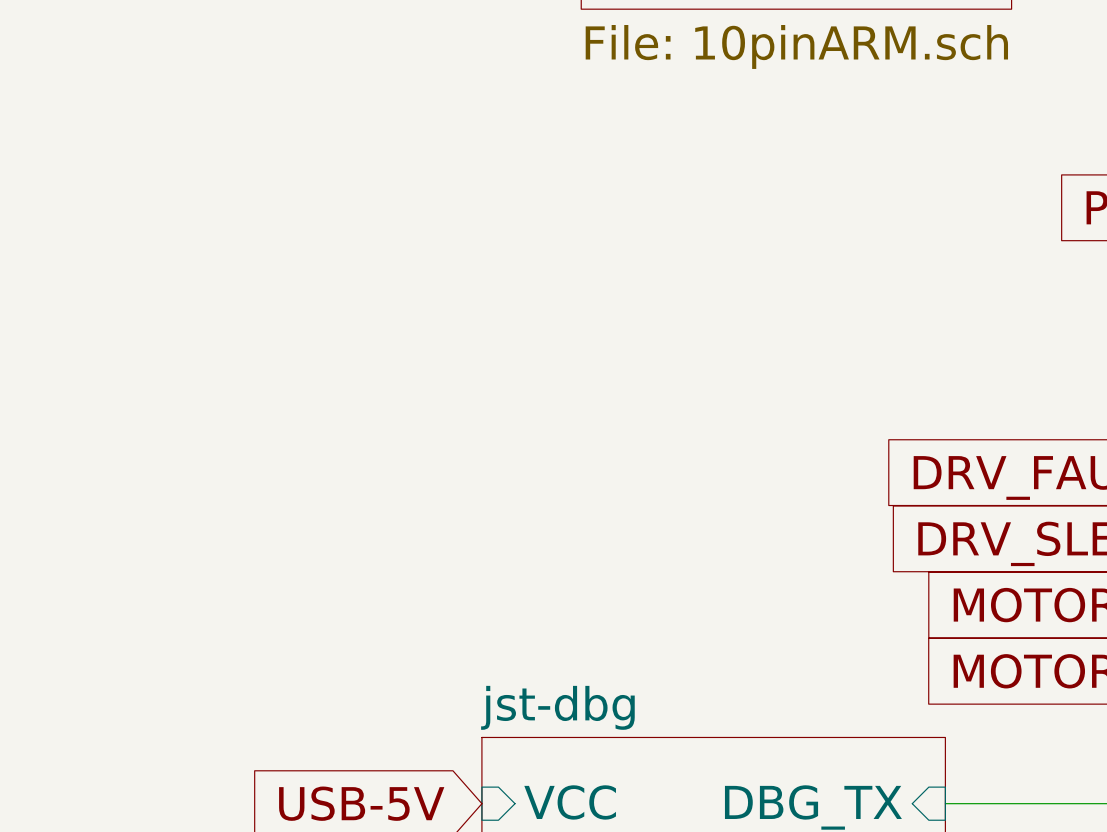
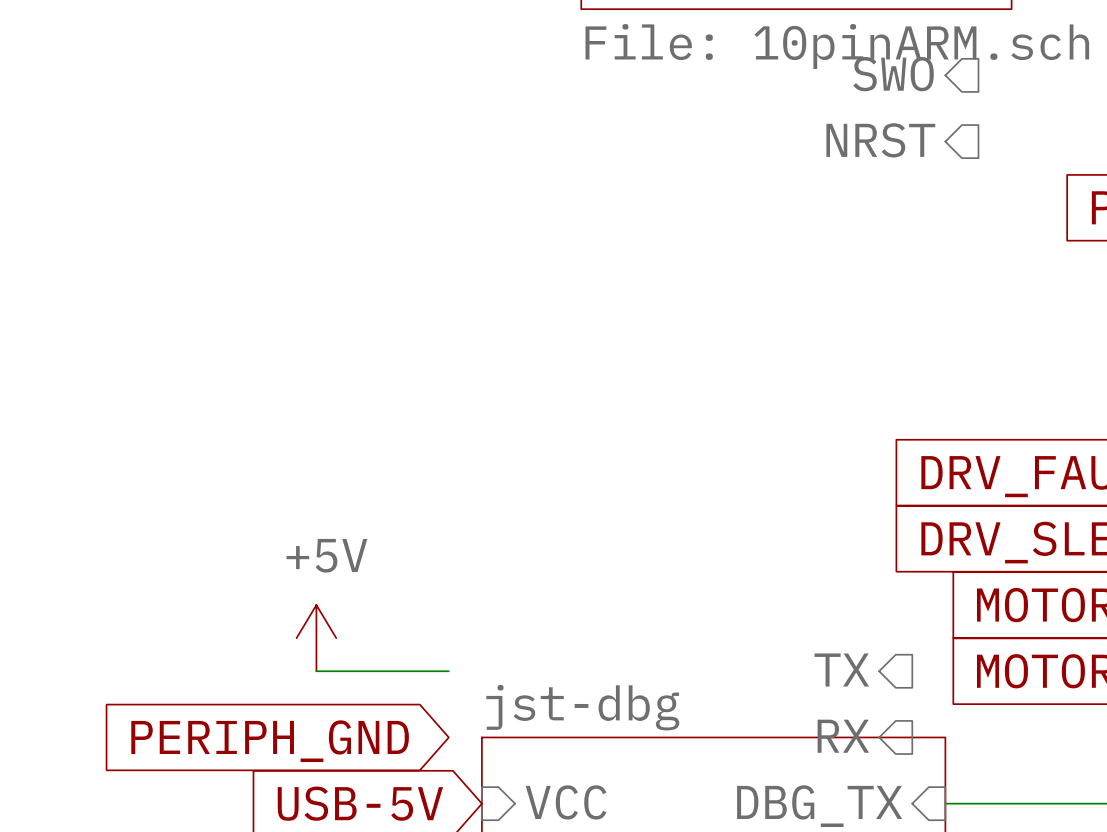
sheet pin: none -> SWO (893, 74)
sheet pin: none -> NRST (880, 140)
power symbol: none -> +5V (316, 638)
sheet pin: none -> TX (841, 670)
wire: none -> (316, 671) (448, 671)
sheet pin: none -> RX (843, 736)
global label: none -> PERIPH_GND (270, 741)

